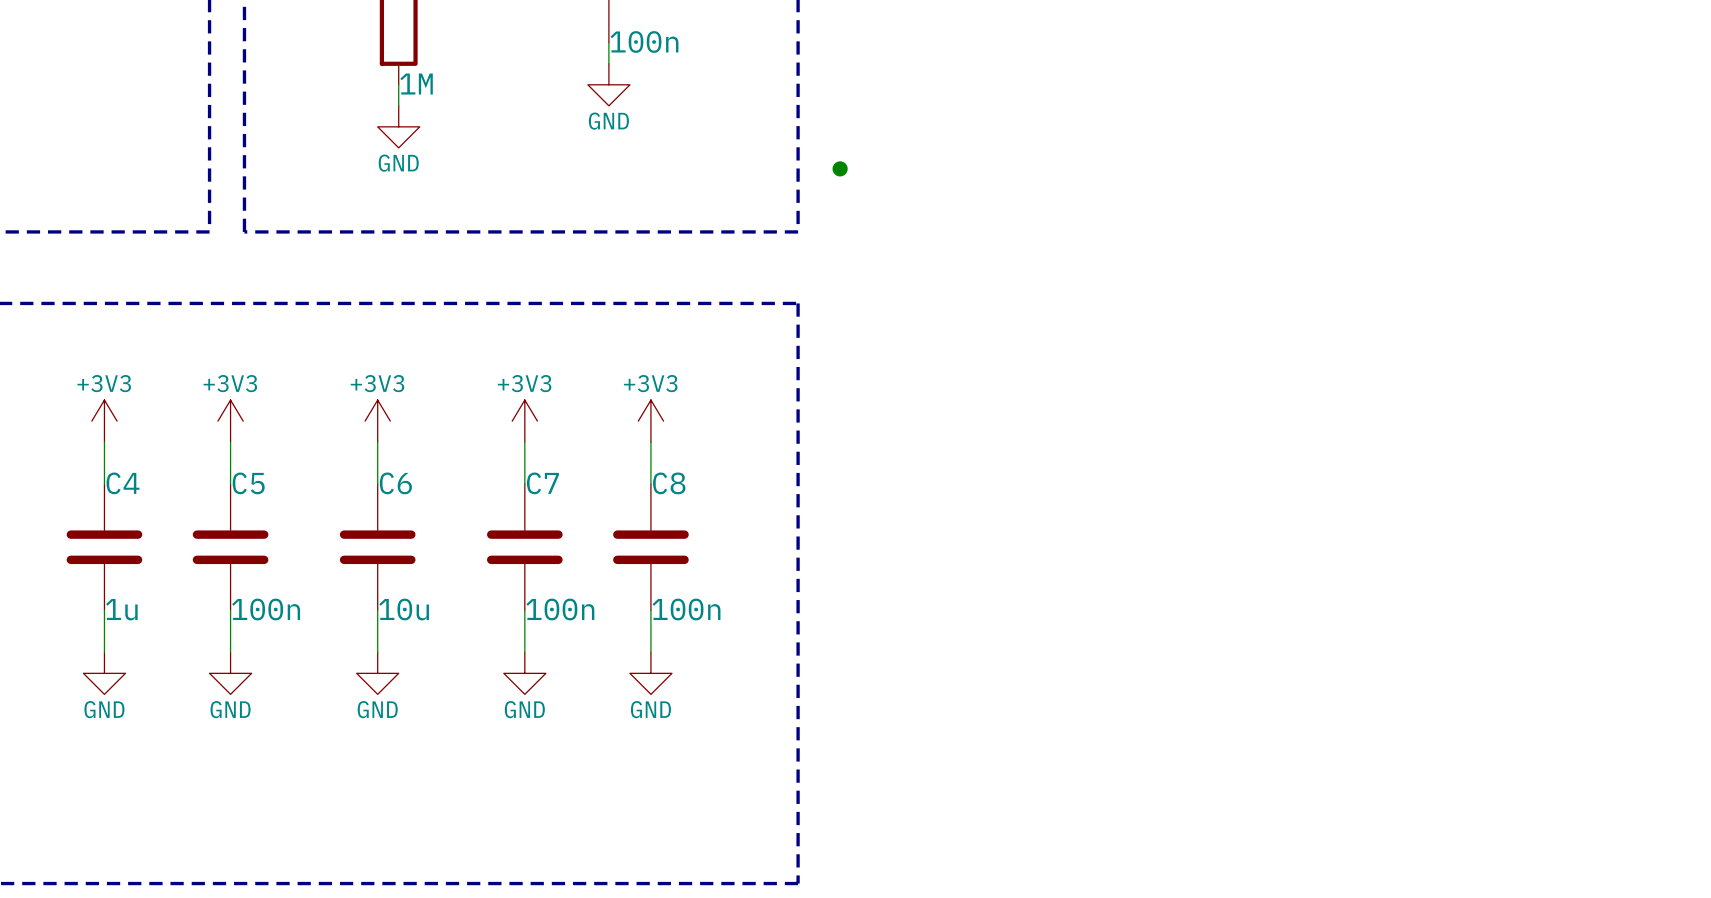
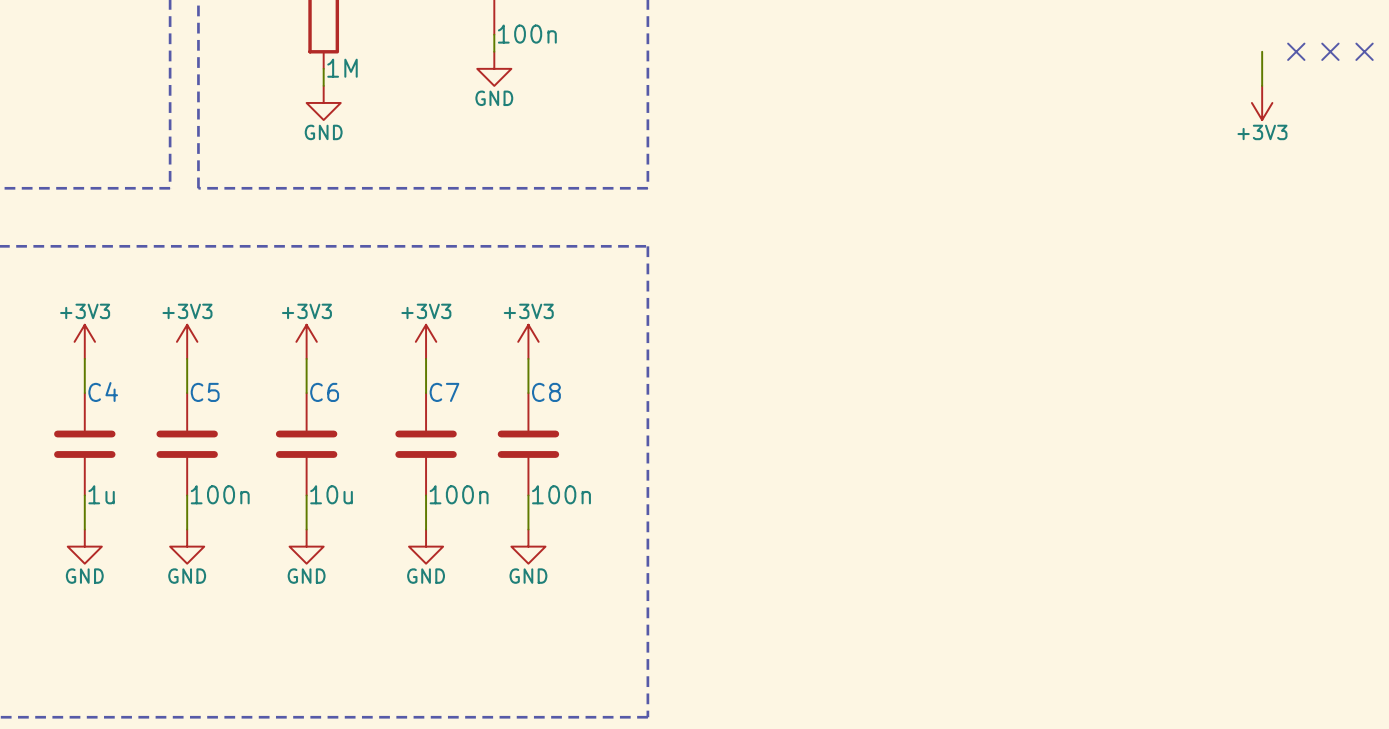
wire: none -> (1262, 51) (1262, 85)
no-connect mark: none -> (1296, 51)
no-connect mark: none -> (1330, 51)
no-connect mark: none -> (1364, 51)
power symbol: none -> +3V3 (1262, 102)
junction: (840, 168) -> none

